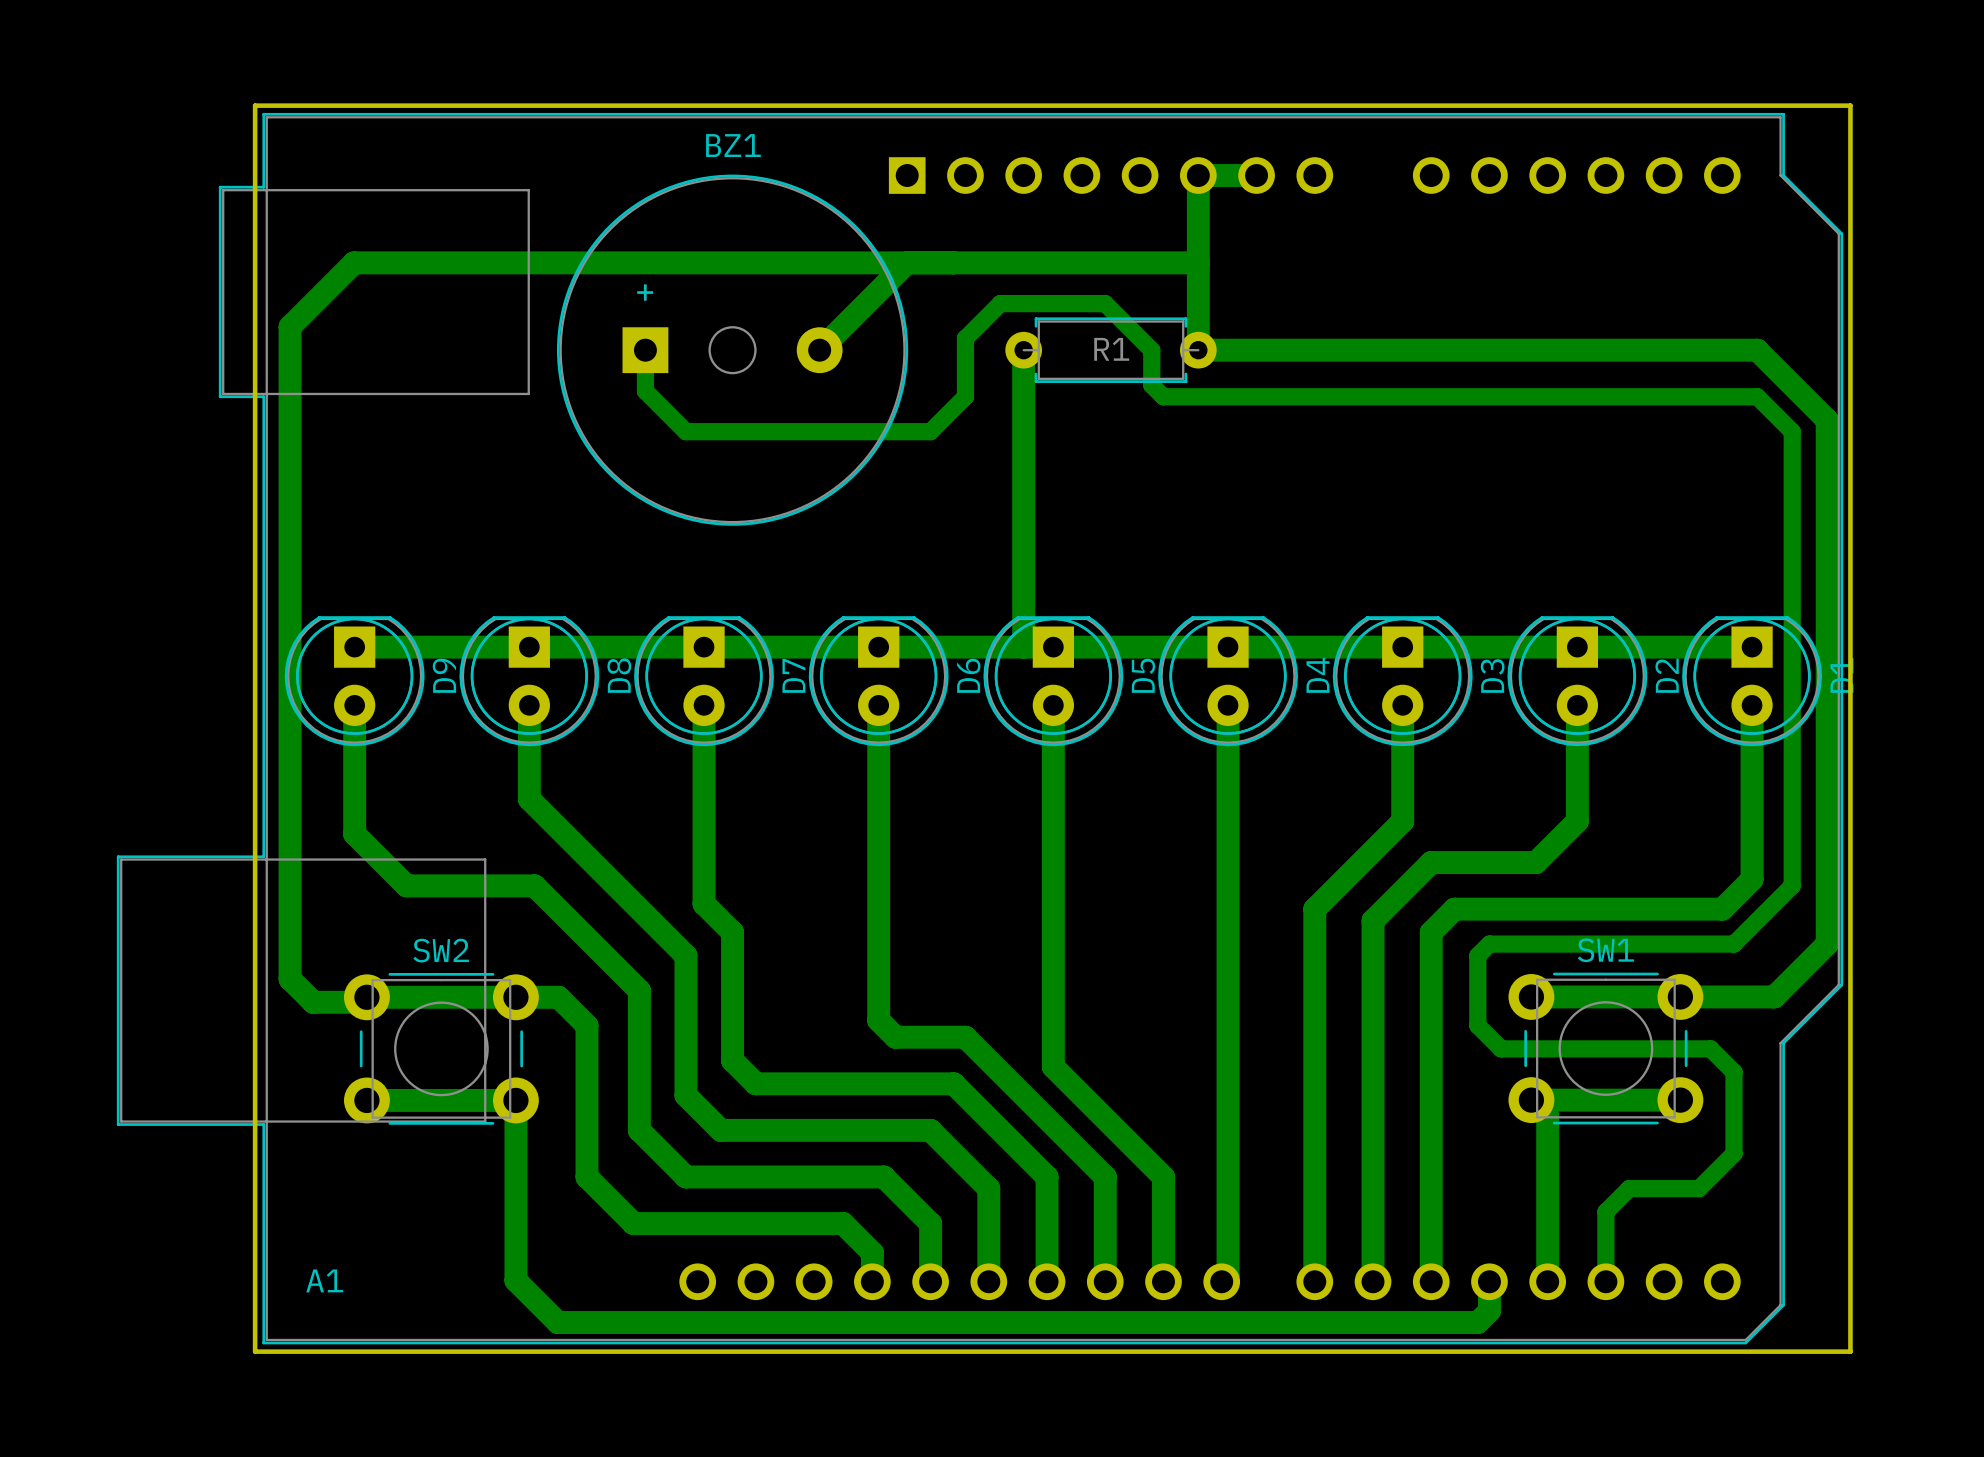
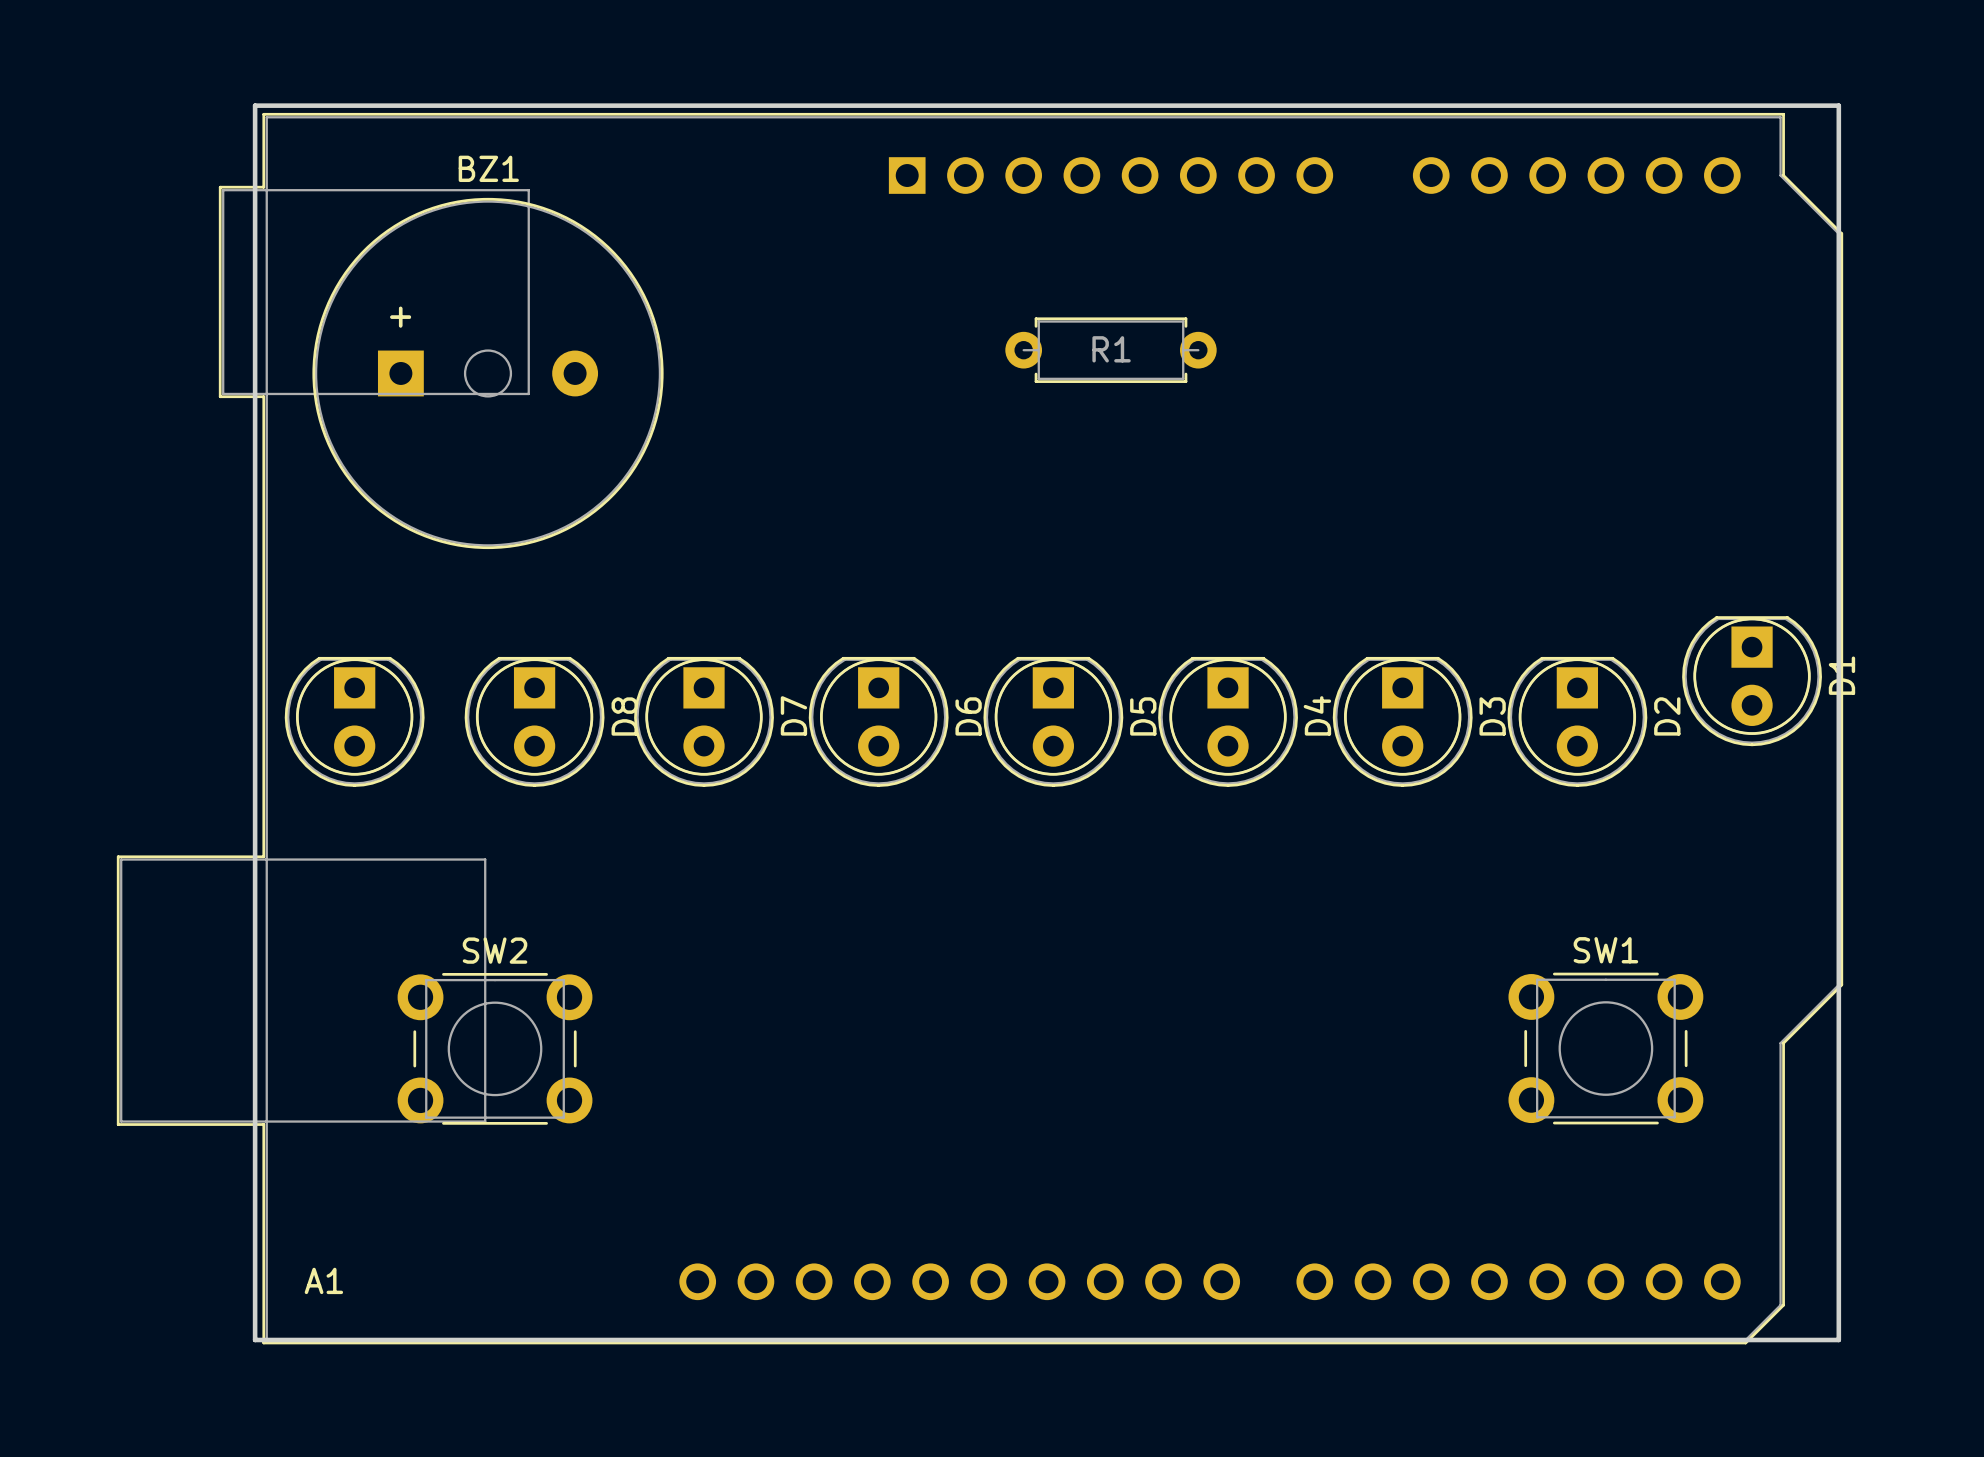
board edge: (1838, 105) (1850, 105) (1850, 1351) (255, 1351) (255, 1339) -> (1838, 105) (1838, 1339) (255, 1339)
bottom track: (1256, 175) (1198, 175) (1198, 350) (1757, 350) (1827, 420) (1827, 944) (1774, 996) (1531, 996) -> none
bottom track: (906, 262) (819, 350) -> none
bottom track: (1198, 262) (354, 262) (290, 326) (290, 979) (313, 1002) (361, 1002) (366, 997) (558, 997) (586, 1025) (586, 1176) (633, 1223) (843, 1223) (872, 1252) (872, 1281) -> none
bottom track: (645, 350) (645, 391) (685, 431) (930, 431) (965, 396) (965, 338) (1000, 303) (1105, 303) (1151, 350) (1151, 385) (1163, 396) (1757, 396) (1792, 431) (1792, 885) (1734, 944) (1489, 944) (1477, 955) (1477, 1025) (1501, 1048) (1710, 1048) (1734, 1072) (1734, 1153) (1699, 1188) (1629, 1188) (1605, 1211) (1605, 1281) -> none
BZ1 position: (732, 350) -> (488, 373)
bottom track: (1023, 350) (1023, 647) -> none
bottom track: (354, 647) (1752, 647) -> none
D9: (354, 681) -> none
D8 position: (529, 681) -> (534, 721)
D7 position: (704, 681) -> (704, 721)
D6 position: (878, 681) -> (878, 721)
D5 position: (1053, 681) -> (1053, 721)
D4 position: (1228, 681) -> (1228, 721)
D3 position: (1402, 681) -> (1402, 721)
D2 position: (1577, 681) -> (1577, 721)
bottom track: (354, 705) (354, 834) (406, 885) (534, 885) (639, 990) (639, 1130) (685, 1176) (883, 1176) (930, 1223) (930, 1281) -> none
bottom track: (529, 705) (529, 799) (685, 955) (685, 1095) (720, 1130) (930, 1130) (988, 1188) (988, 1281) -> none
bottom track: (704, 705) (704, 903) (732, 932) (732, 1060) (755, 1083) (953, 1083) (1047, 1177) (1047, 1281) -> none
bottom track: (878, 705) (878, 1020) (895, 1037) (965, 1037) (1105, 1177) (1105, 1281) -> none
bottom track: (1053, 705) (1053, 1066) (1163, 1177) (1163, 1281) -> none
bottom track: (1228, 705) (1228, 1275) (1221, 1281) -> none
bottom track: (1402, 705) (1402, 821) (1314, 909) (1314, 1281) -> none
bottom track: (1577, 705) (1577, 821) (1536, 862) (1431, 862) (1373, 920) (1373, 1281) -> none
bottom track: (1752, 705) (1752, 879) (1722, 909) (1454, 909) (1431, 932) (1431, 1281) -> none
part: none -> (354, 721)
SW2 position: (441, 1048) -> (495, 1048)
bottom track: (366, 1100) (515, 1100) (515, 1280) (557, 1322) (1477, 1322) (1489, 1310) (1489, 1281) -> none
bottom track: (1680, 1100) (1531, 1100) (1547, 1116) (1547, 1281) -> none

